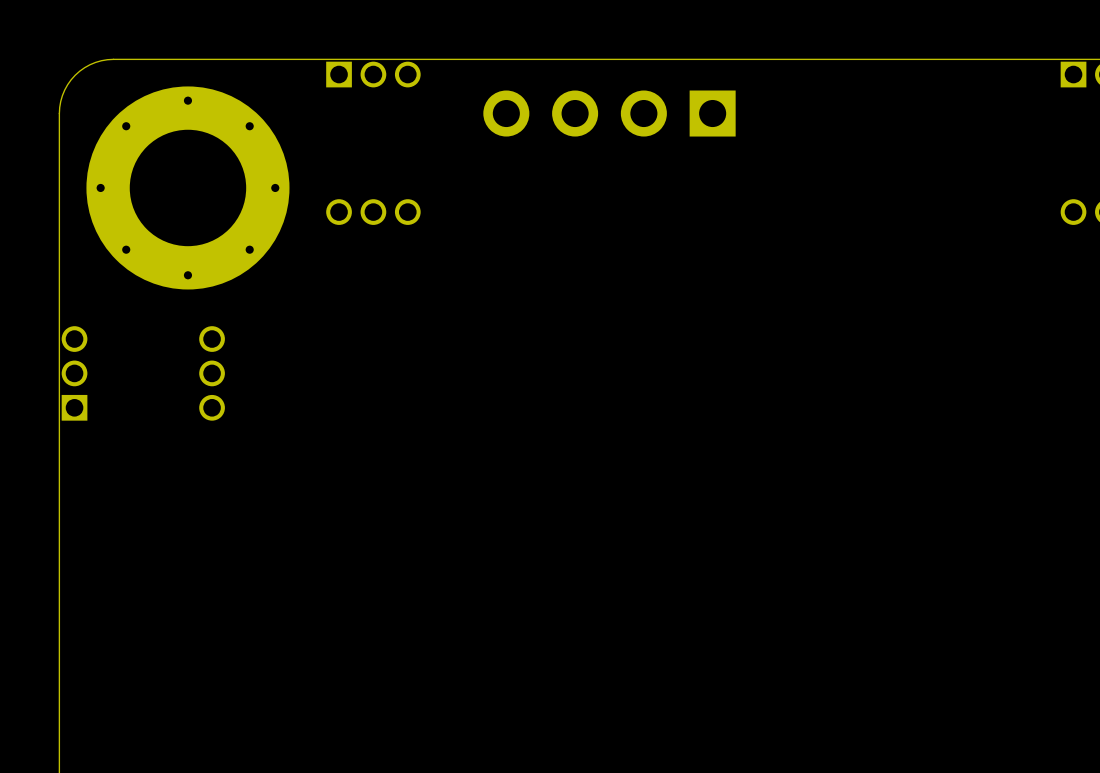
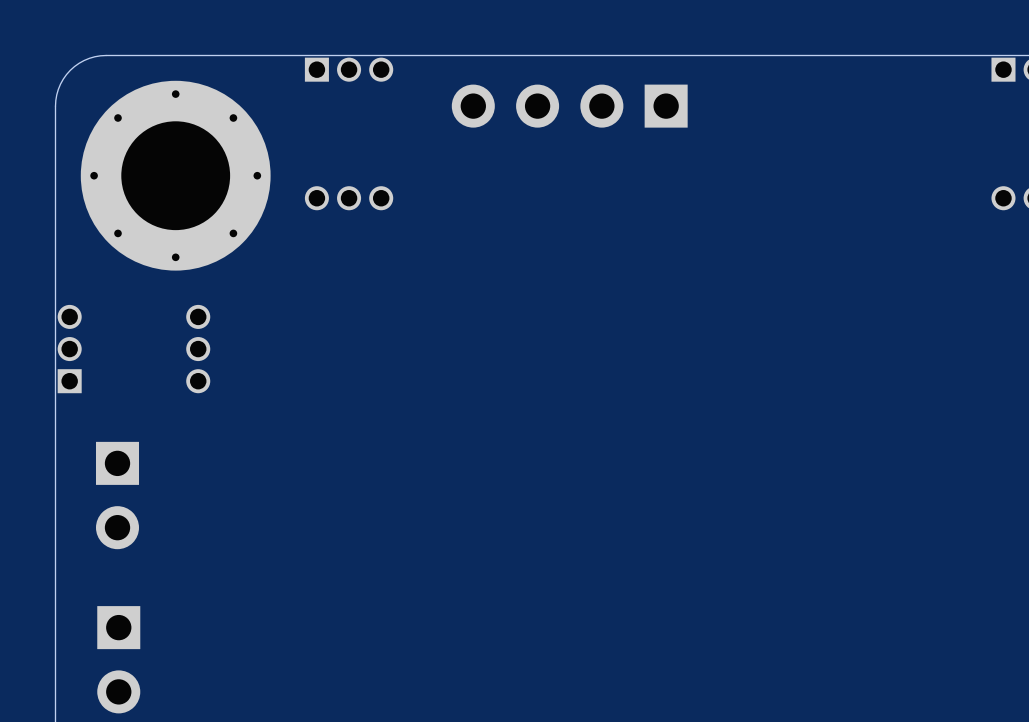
part: none -> (117, 495)
part: none -> (118, 659)

